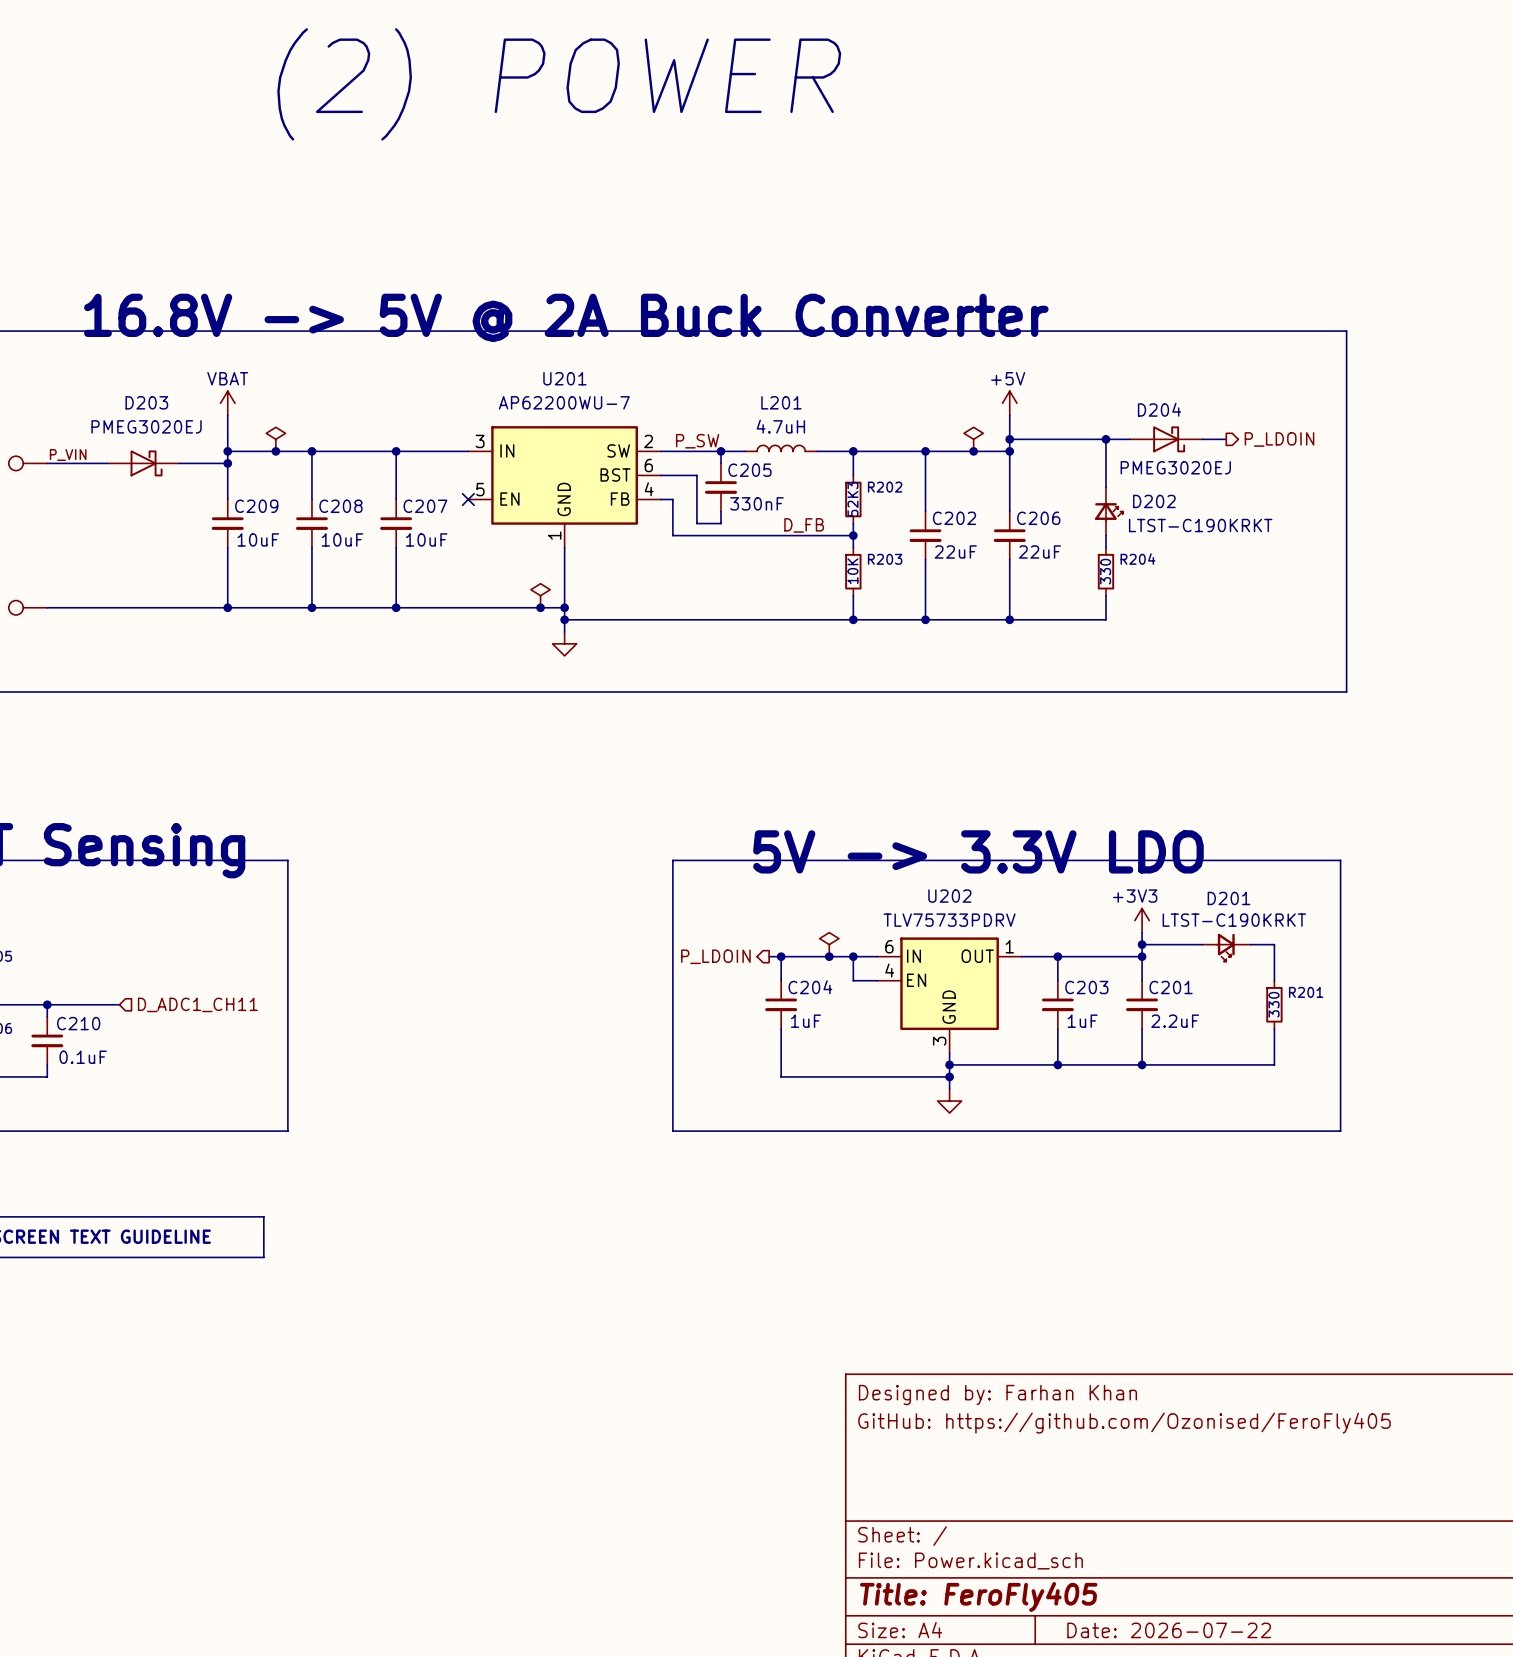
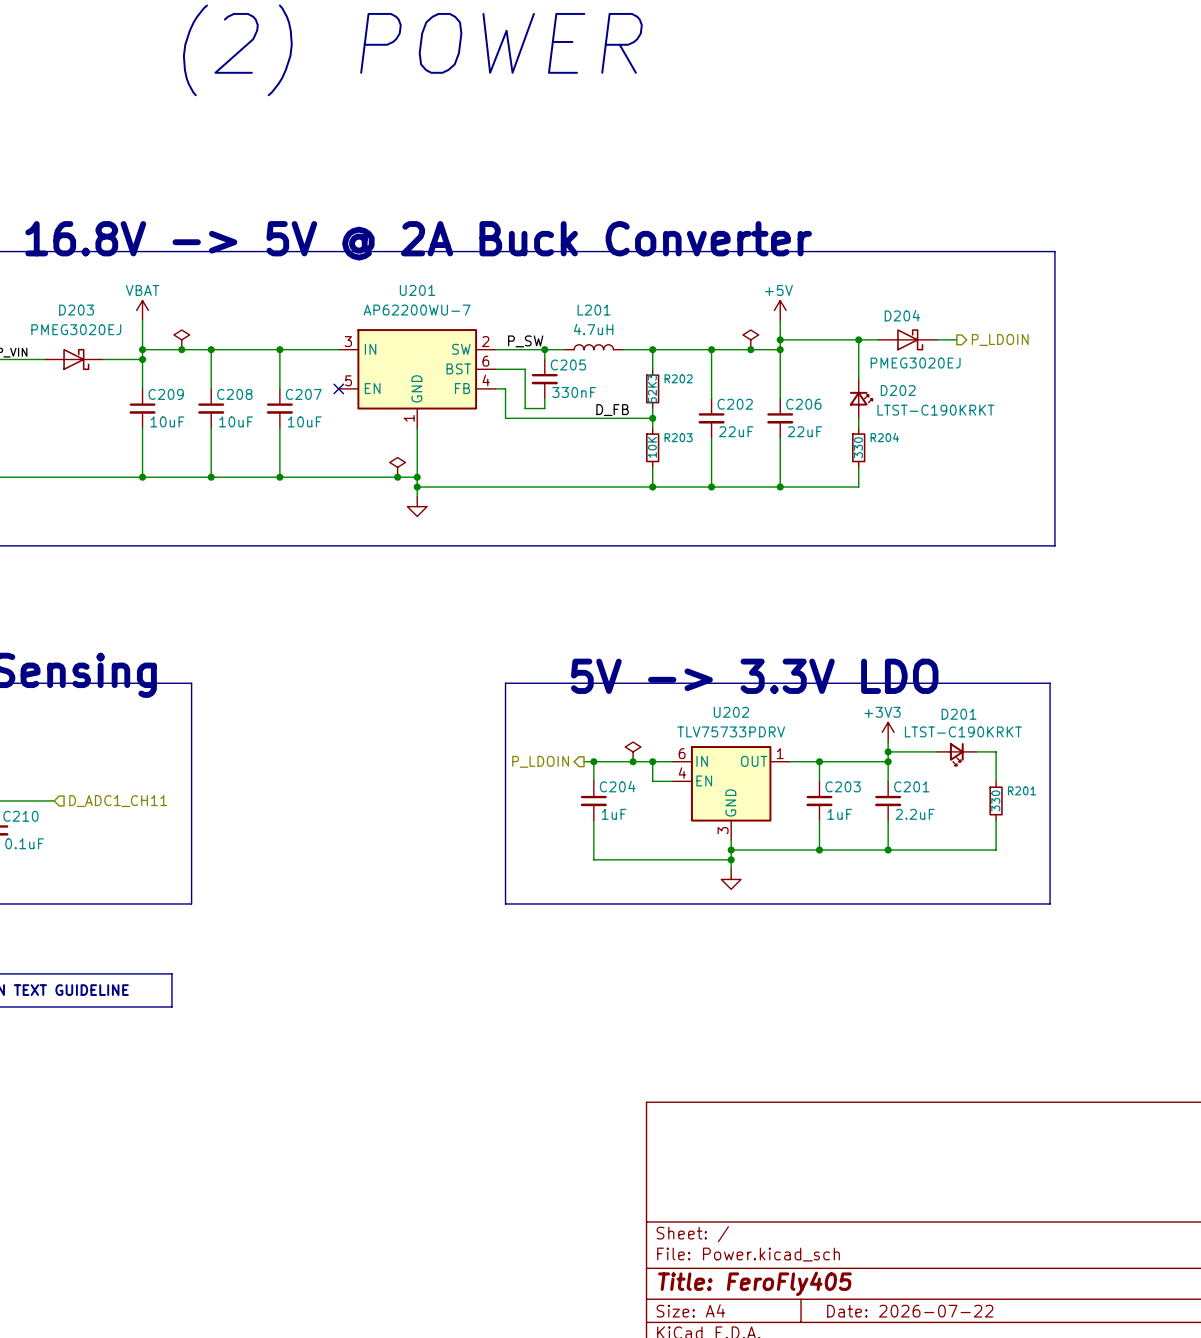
title block: Designed by: Farhan Khan (997, 1395) -> none
title block: GitHub: https://github.com/Ozonised/FeroFly405 (1124, 1423) -> none

